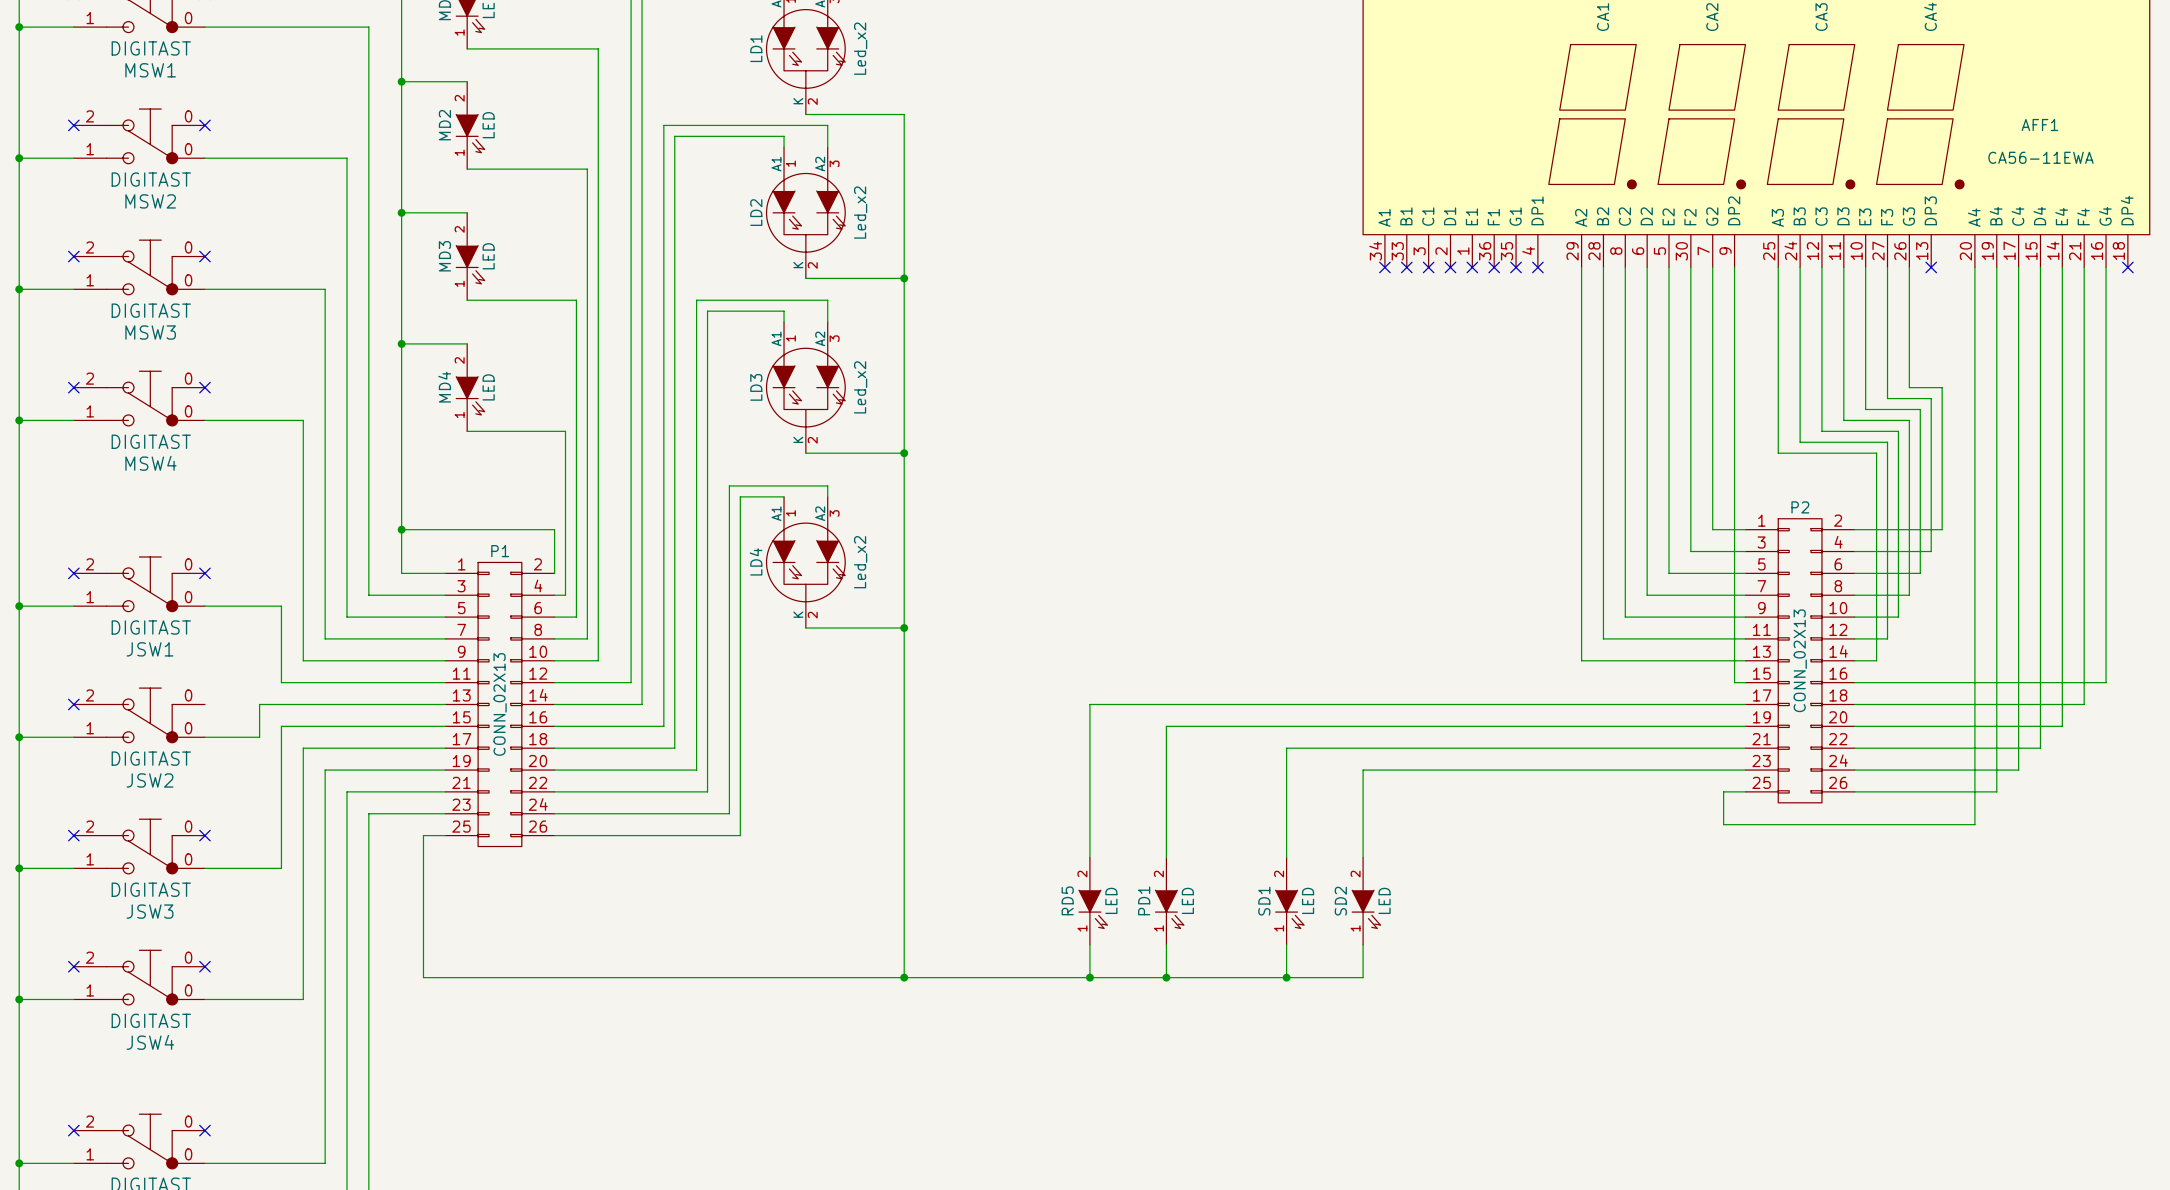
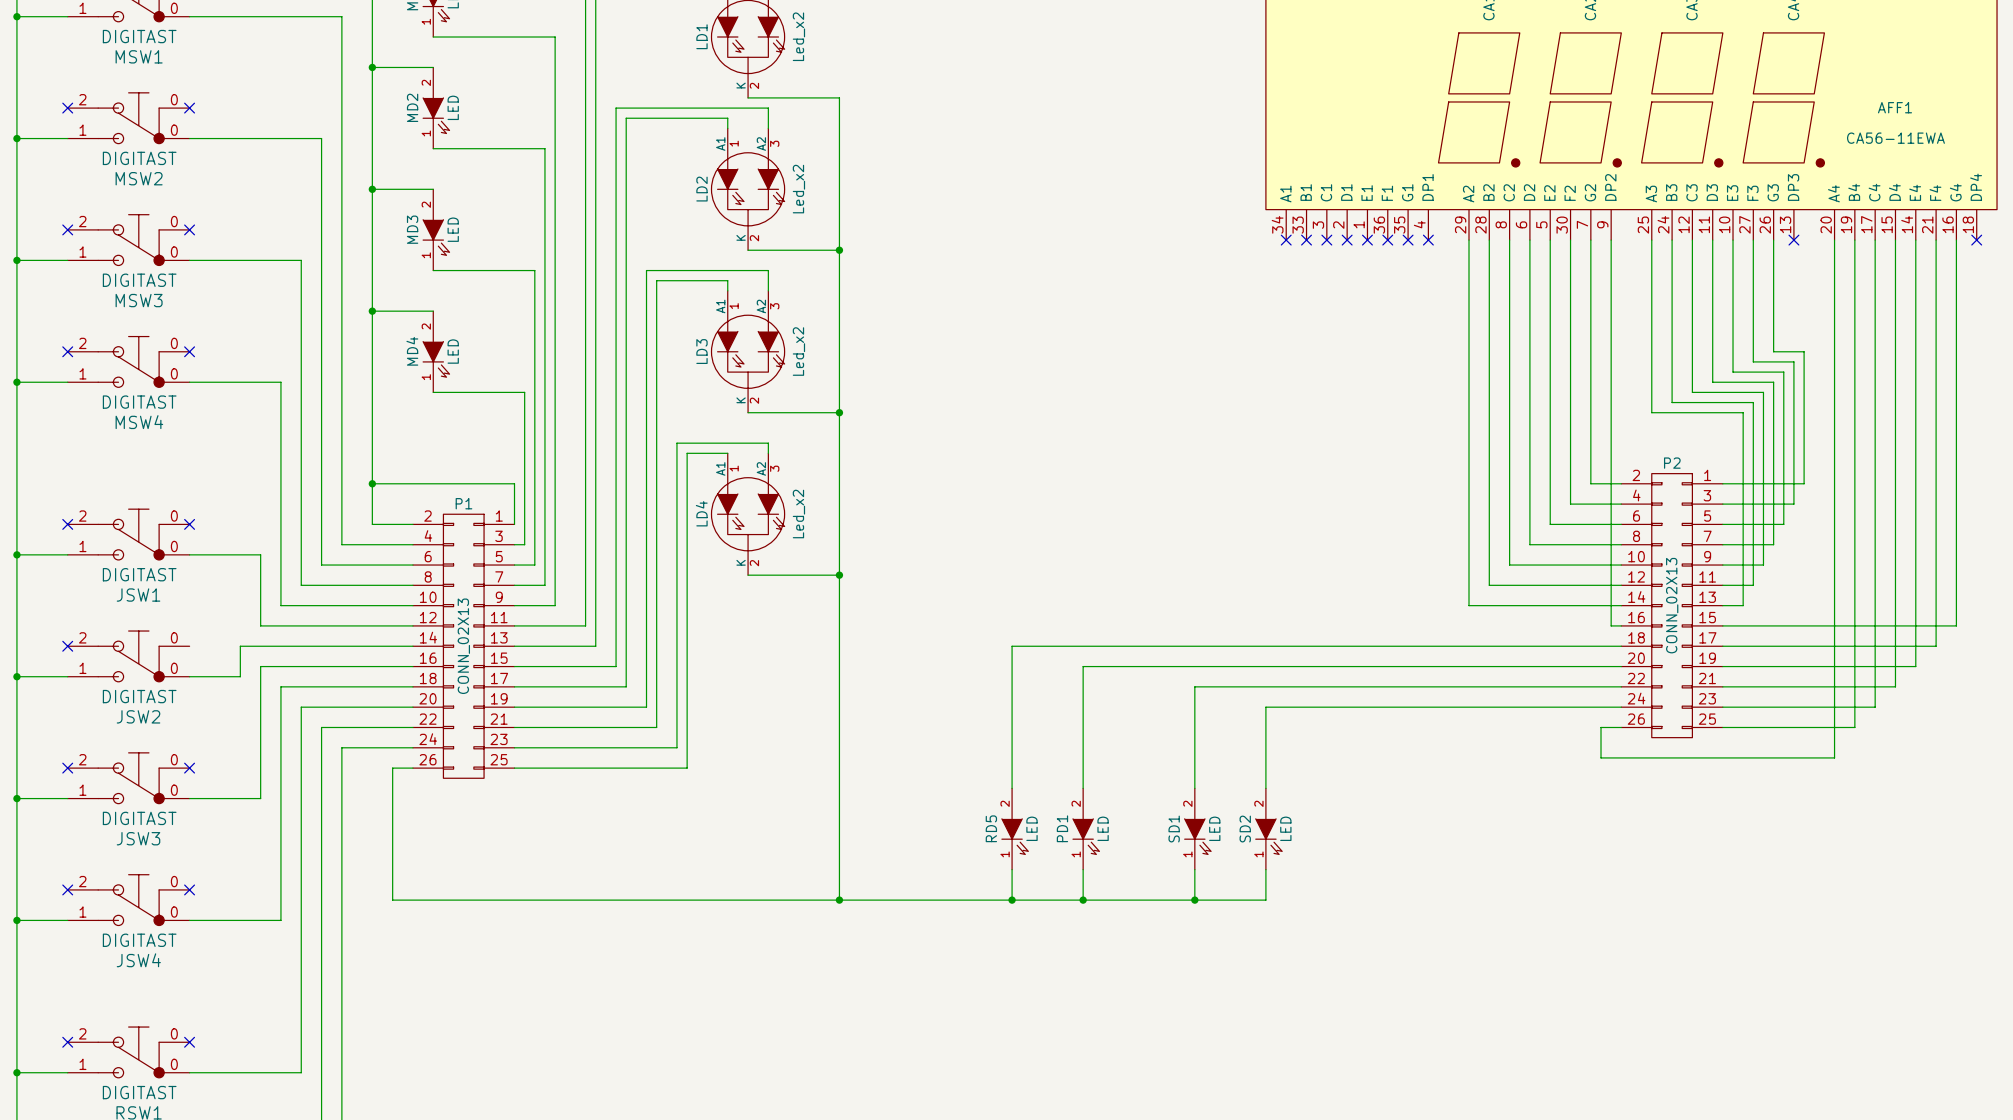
P2 flip: as is (1800, 660) -> left-right (1672, 605)
P1 flip: as is (499, 704) -> left-right (463, 646)

